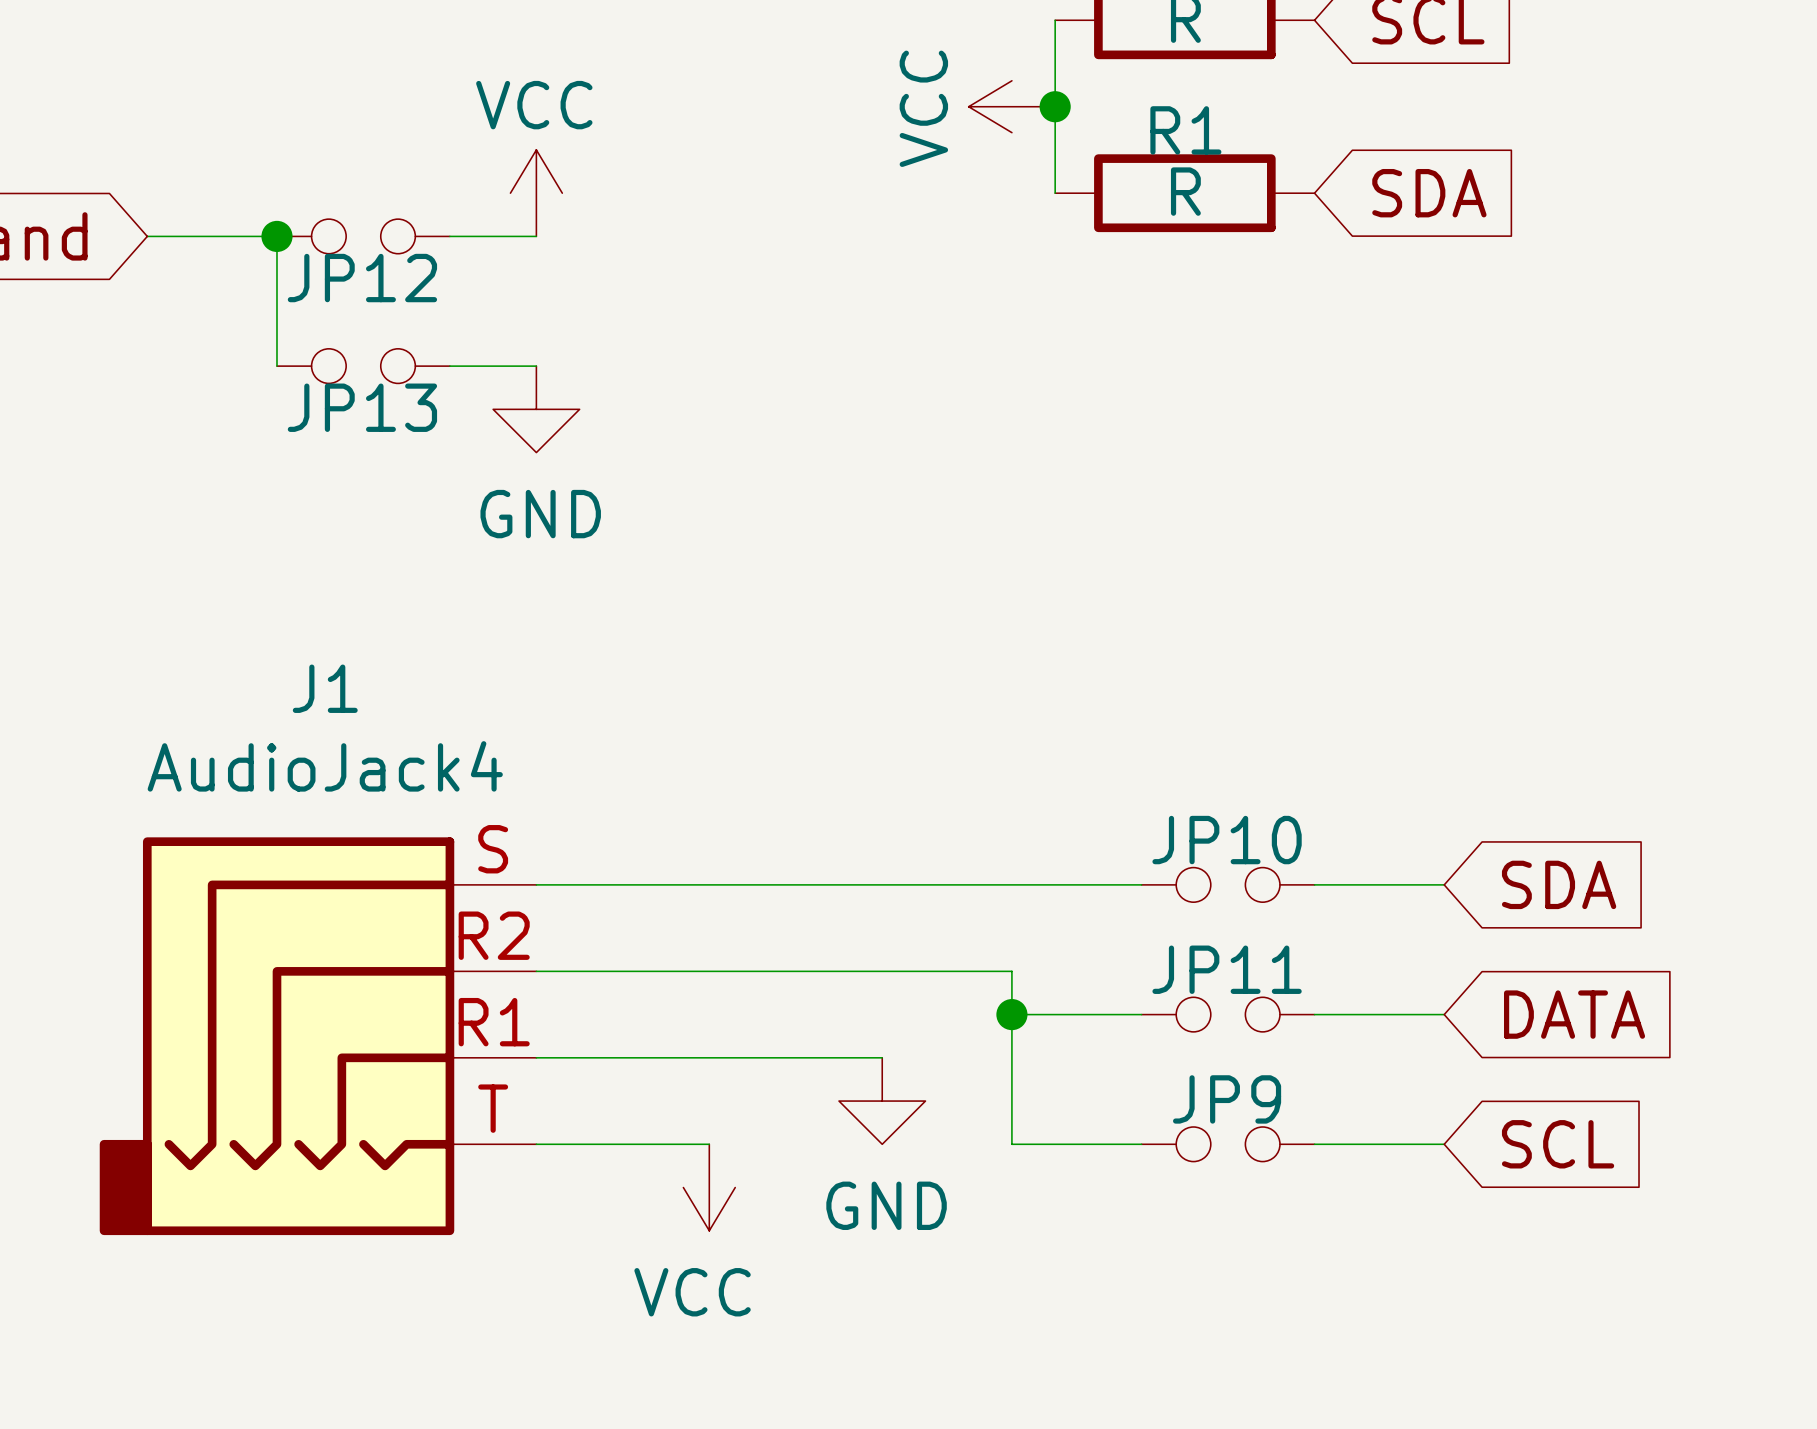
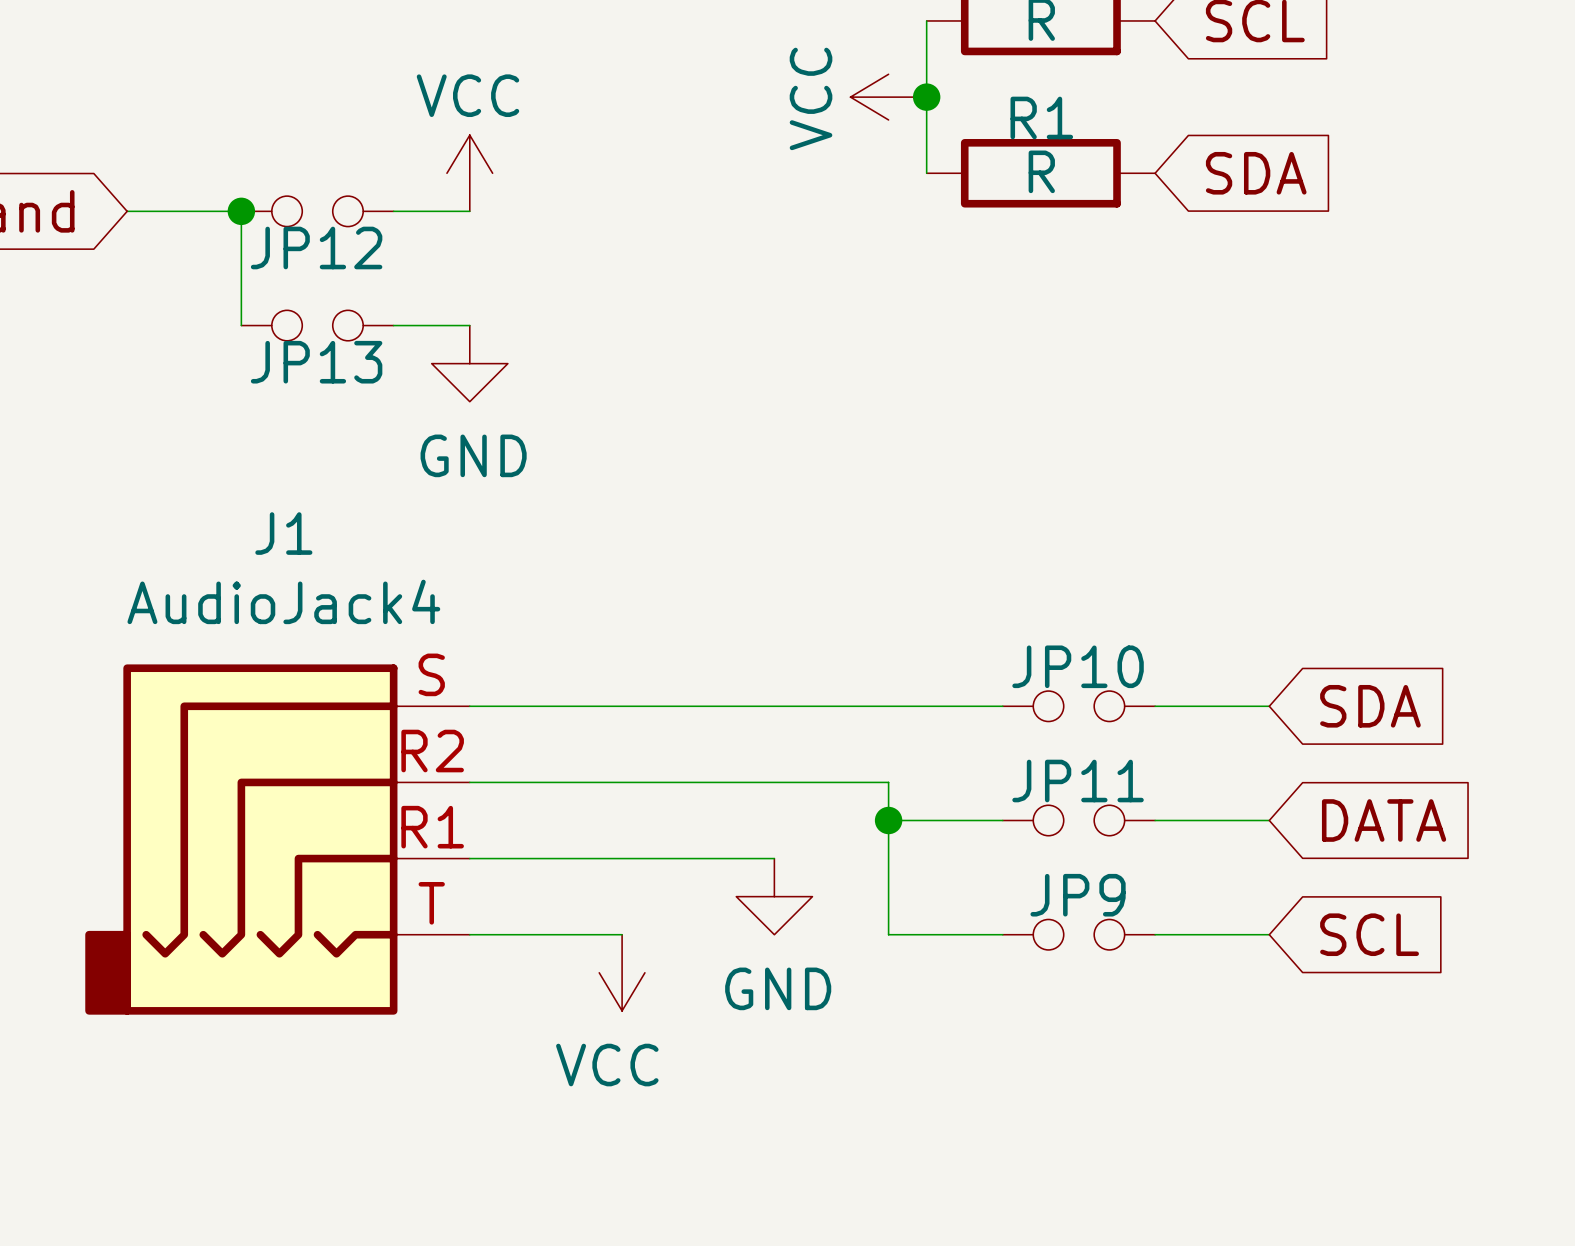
wire: none -> (469, 706) (1002, 706)
wire: (1011, 884) (1141, 884) -> (888, 782) (888, 858)
JP10 position: (1228, 884) -> (1078, 706)
wire: (1314, 884) (1444, 884) -> (1155, 820) (1269, 820)
global label position: SDA (1559, 884) -> SDA (1370, 706)
wire: (882, 971) (1011, 971) -> none
wire: (1011, 1014) (1141, 1014) -> (888, 820) (1002, 820)
junction position: (1011, 1014) -> (888, 820)
JP11 position: (1228, 1014) -> (1078, 820)
wire: (1314, 1014) (1444, 1014) -> (1155, 934) (1269, 934)
global label position: DATA (1574, 1014) -> DATA (1384, 820)
J1 position: (318, 1036) -> (277, 839)
wire: (709, 1057) (882, 1057) -> none
wire: (1011, 1057) (1011, 1144) (1141, 1144) -> (888, 934) (1002, 934)
power symbol position: GND (882, 1101) -> GND (774, 896)
wire: (536, 1144) (709, 1144) -> none
JP9 position: (1228, 1144) -> (1078, 934)
wire: (1314, 1144) (1444, 1144) -> (1155, 706) (1269, 706)
global label position: SCL (1558, 1144) -> SCL (1369, 934)
power symbol position: VCC (709, 1187) -> VCC (622, 972)

